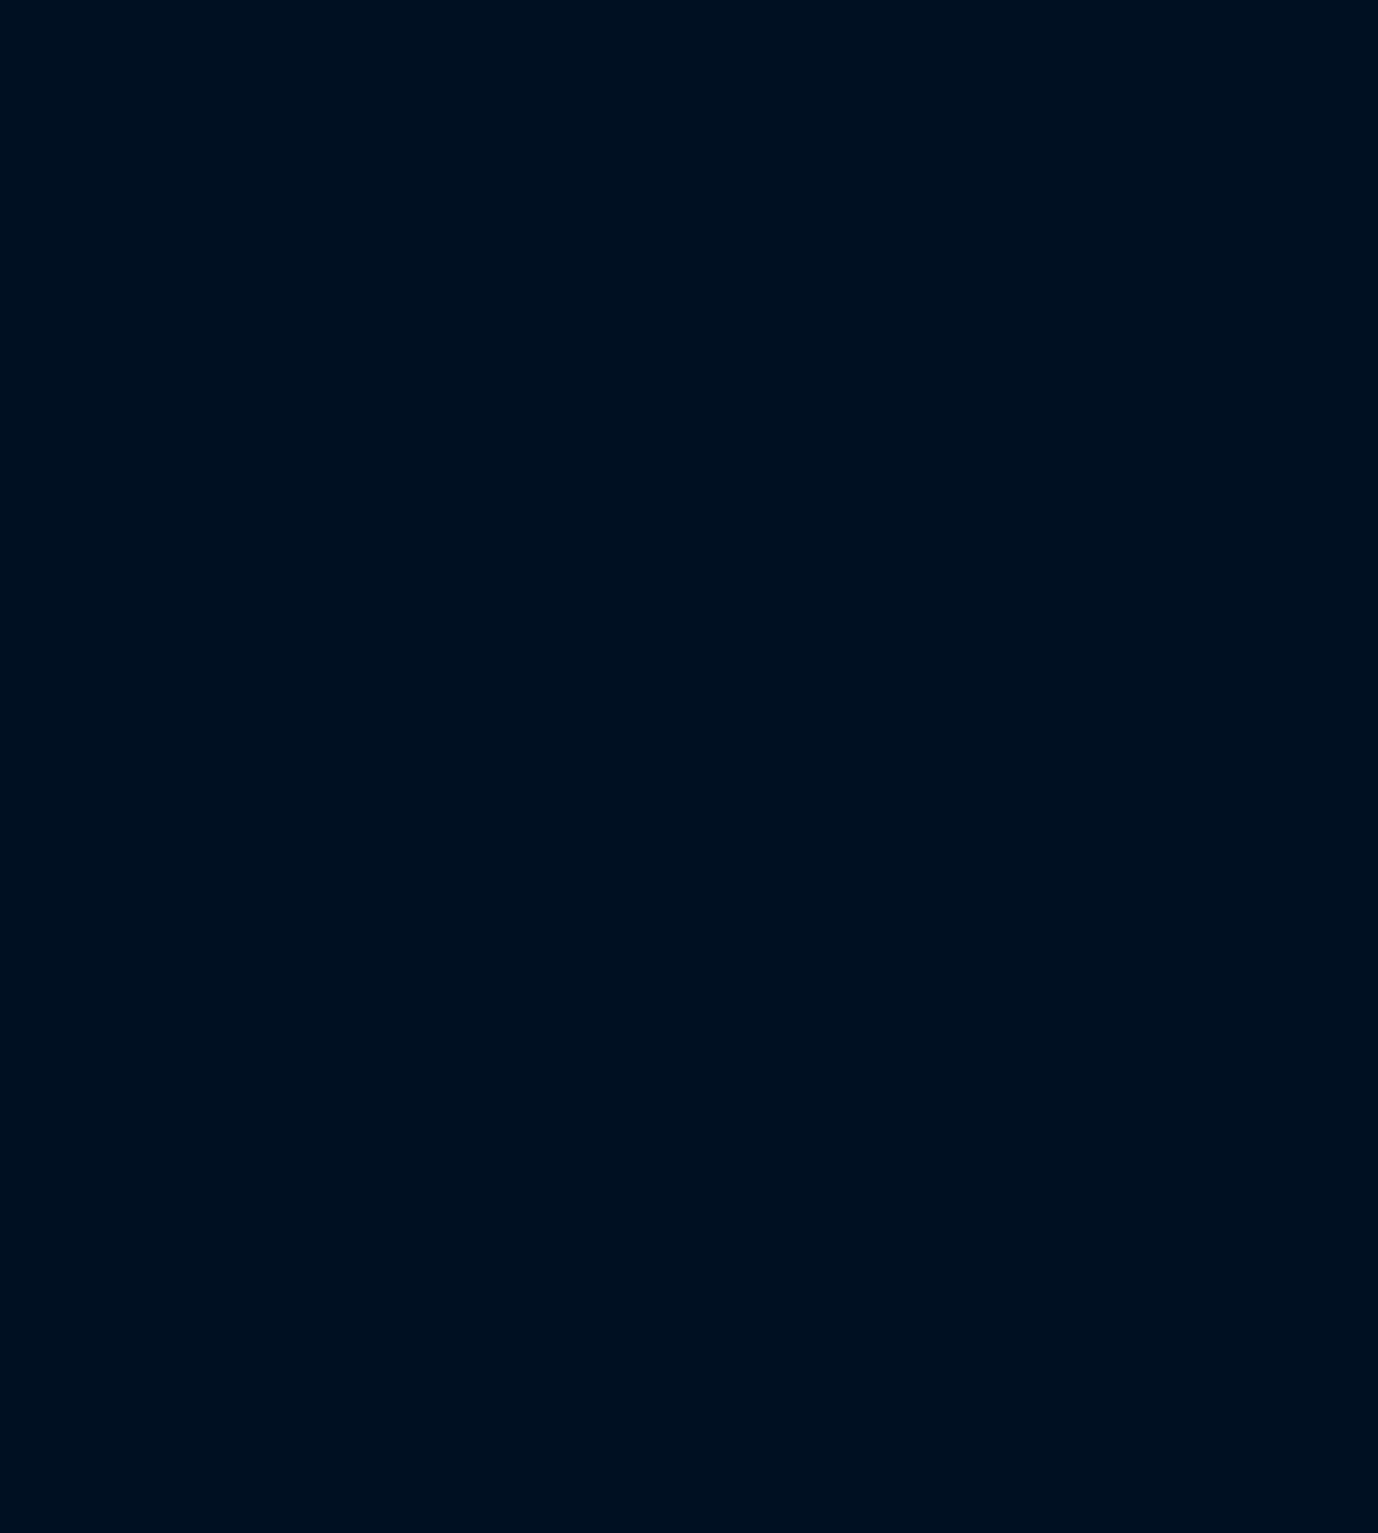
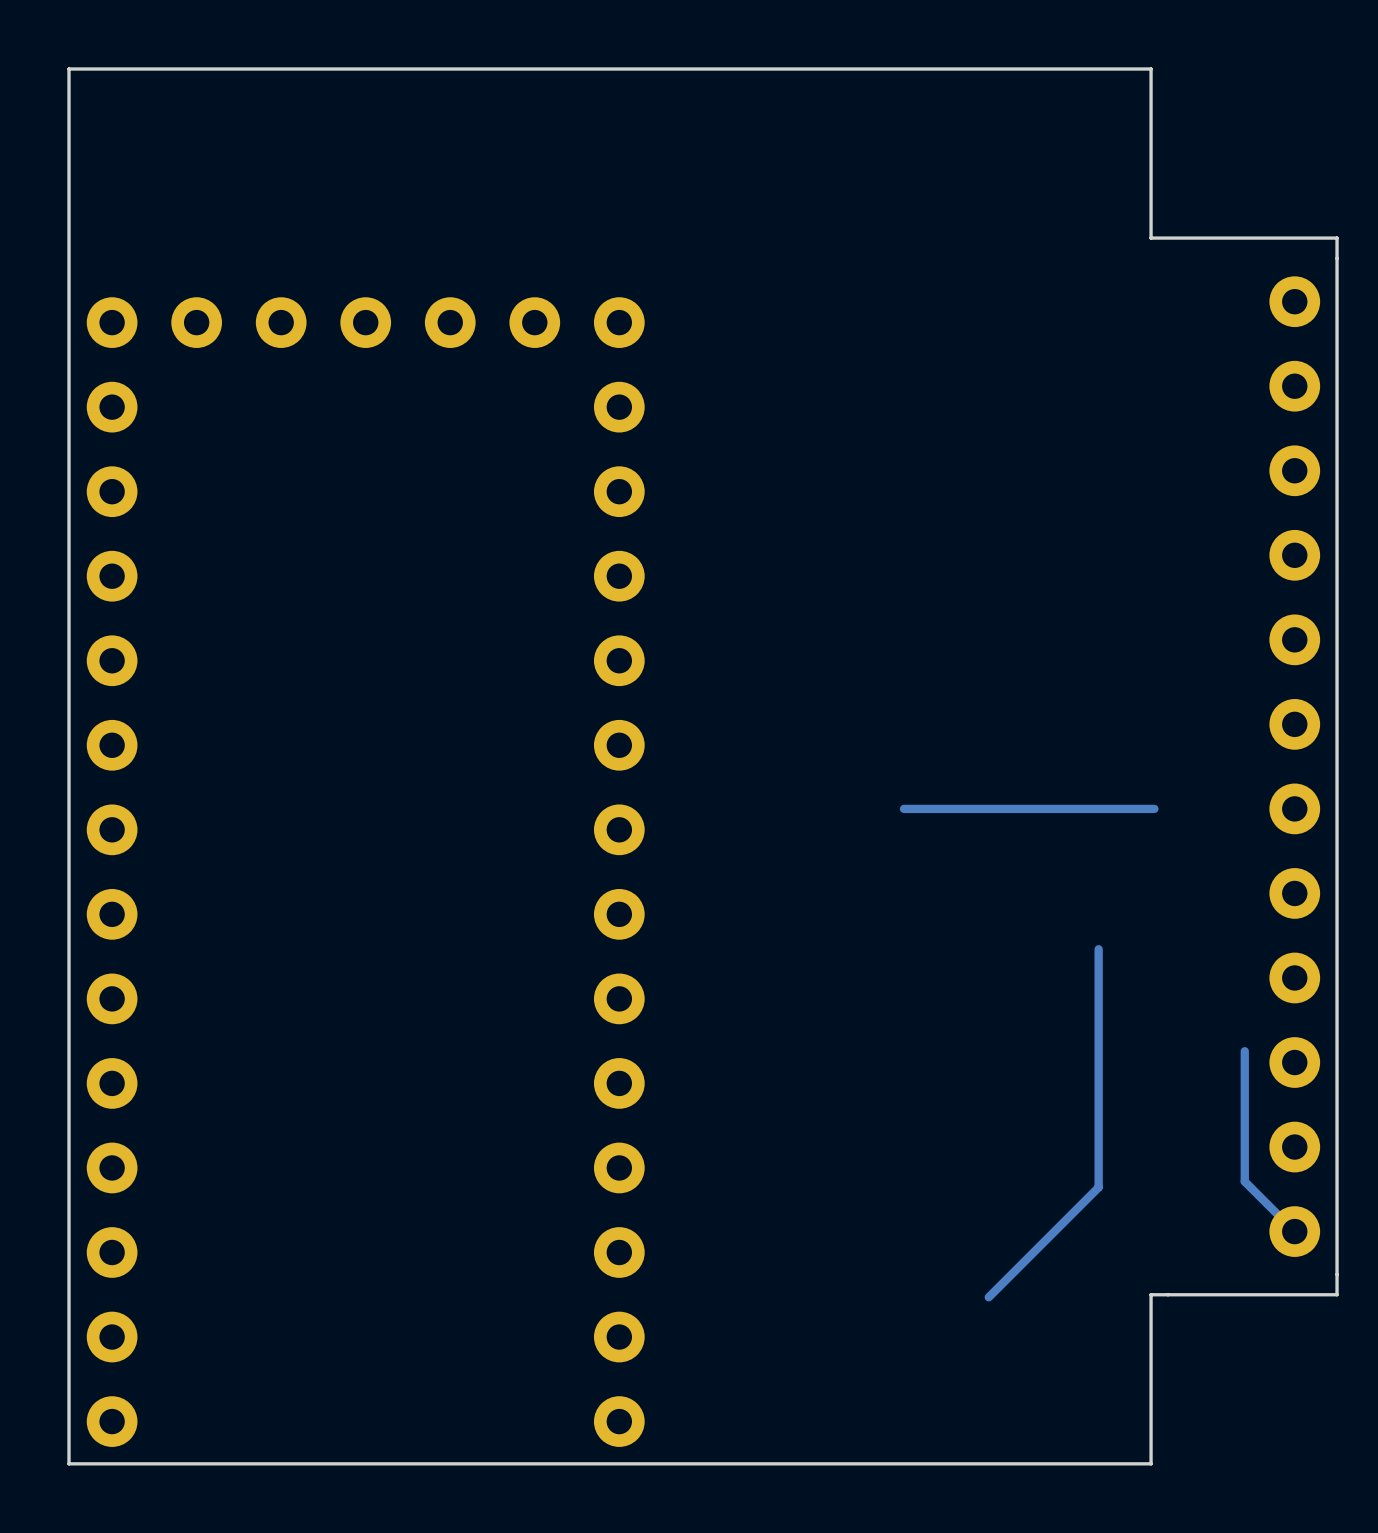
board edge: none -> (1151, 69) (1151, 238) (1337, 238) (1337, 1294) (1151, 1294) (1151, 1463) (69, 1463) (69, 69) (1151, 69)
part: none -> (1294, 766)
track: none -> (1154, 808) (903, 808)
part: none -> (365, 872)
track: none -> (1098, 949) (1098, 1187) (988, 1297)
track: none -> (1244, 1051) (1244, 1181) (1294, 1231)

